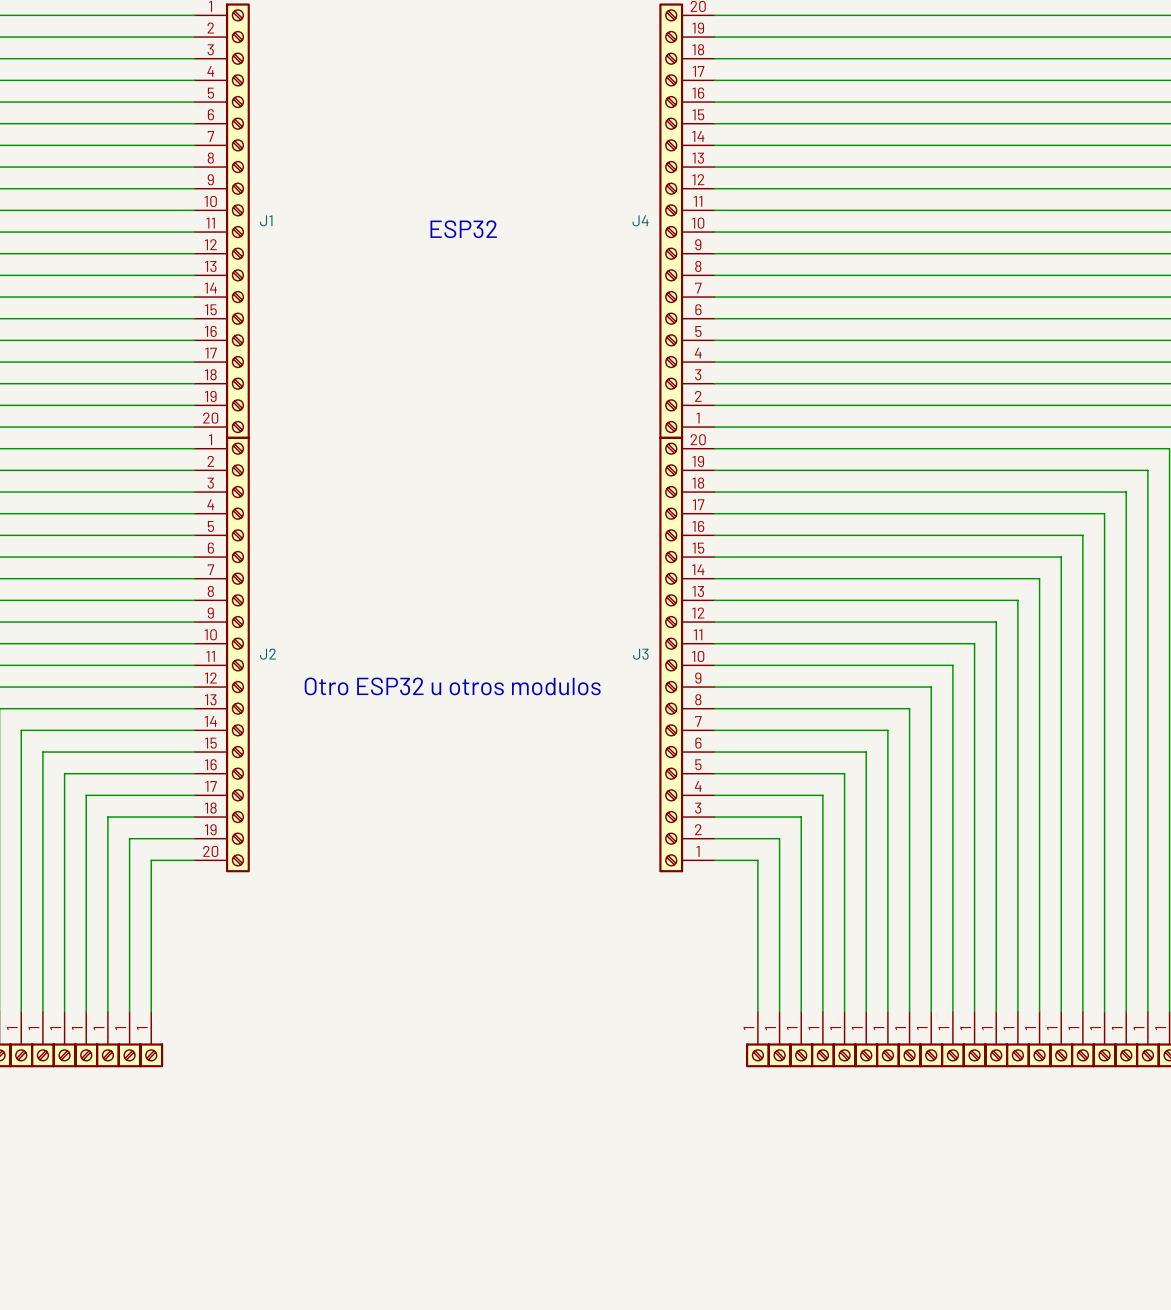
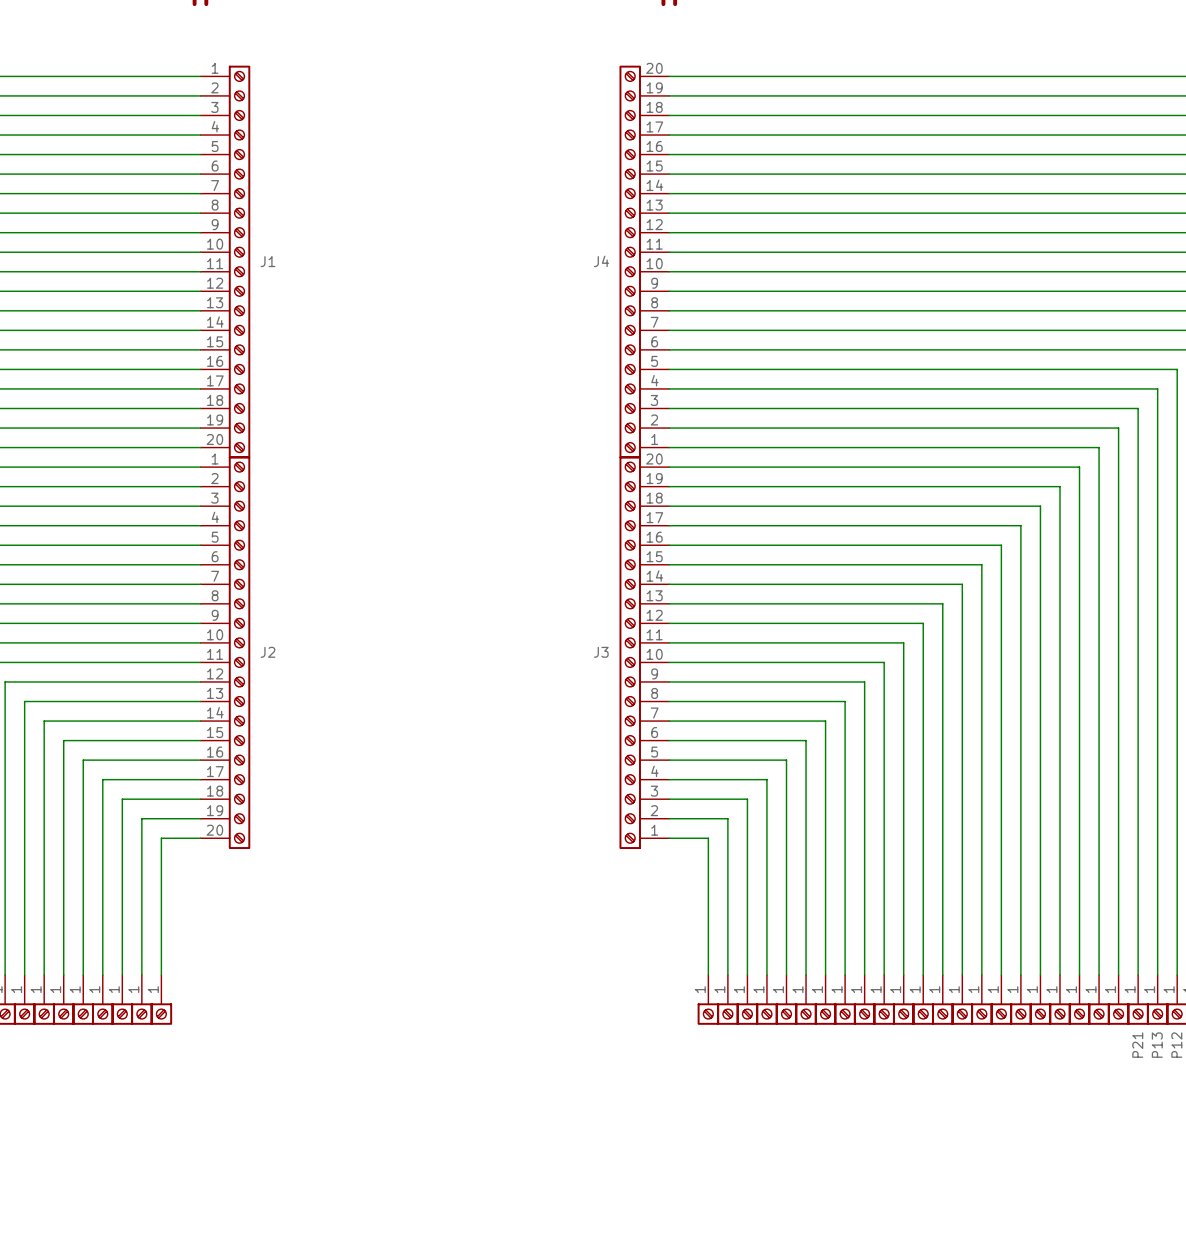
text: ESP32 (463, 229) -> none
text: Otro ESP32 u otros modulos (452, 686) -> none

